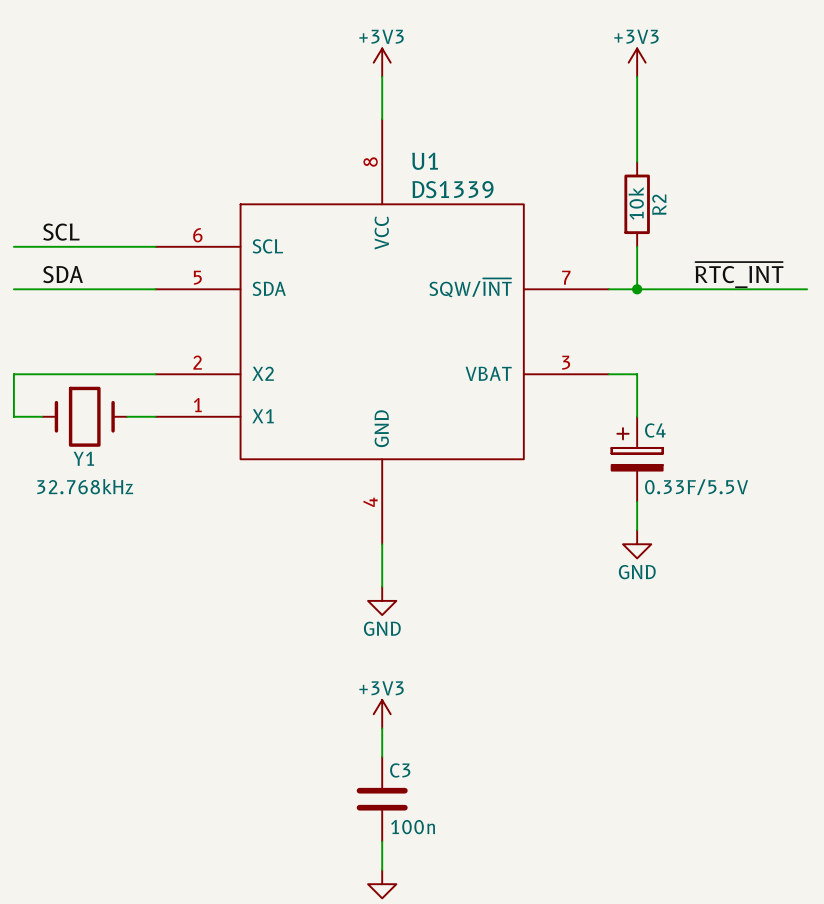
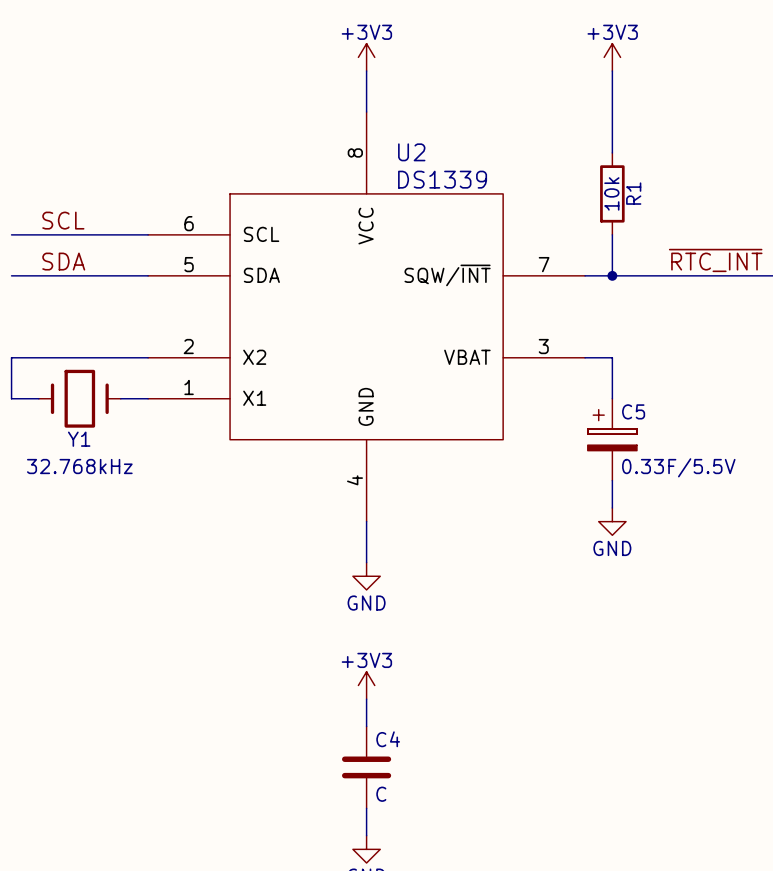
U1 name: U1 (425, 161) -> U2 (411, 152)
R2 name: R2 (659, 204) -> R1 (633, 193)
C4 name: C4 (655, 430) -> C5 (633, 411)
C3 name: C3 (400, 770) -> C4 (388, 739)
C3 value: 100n (413, 827) -> C (381, 794)

